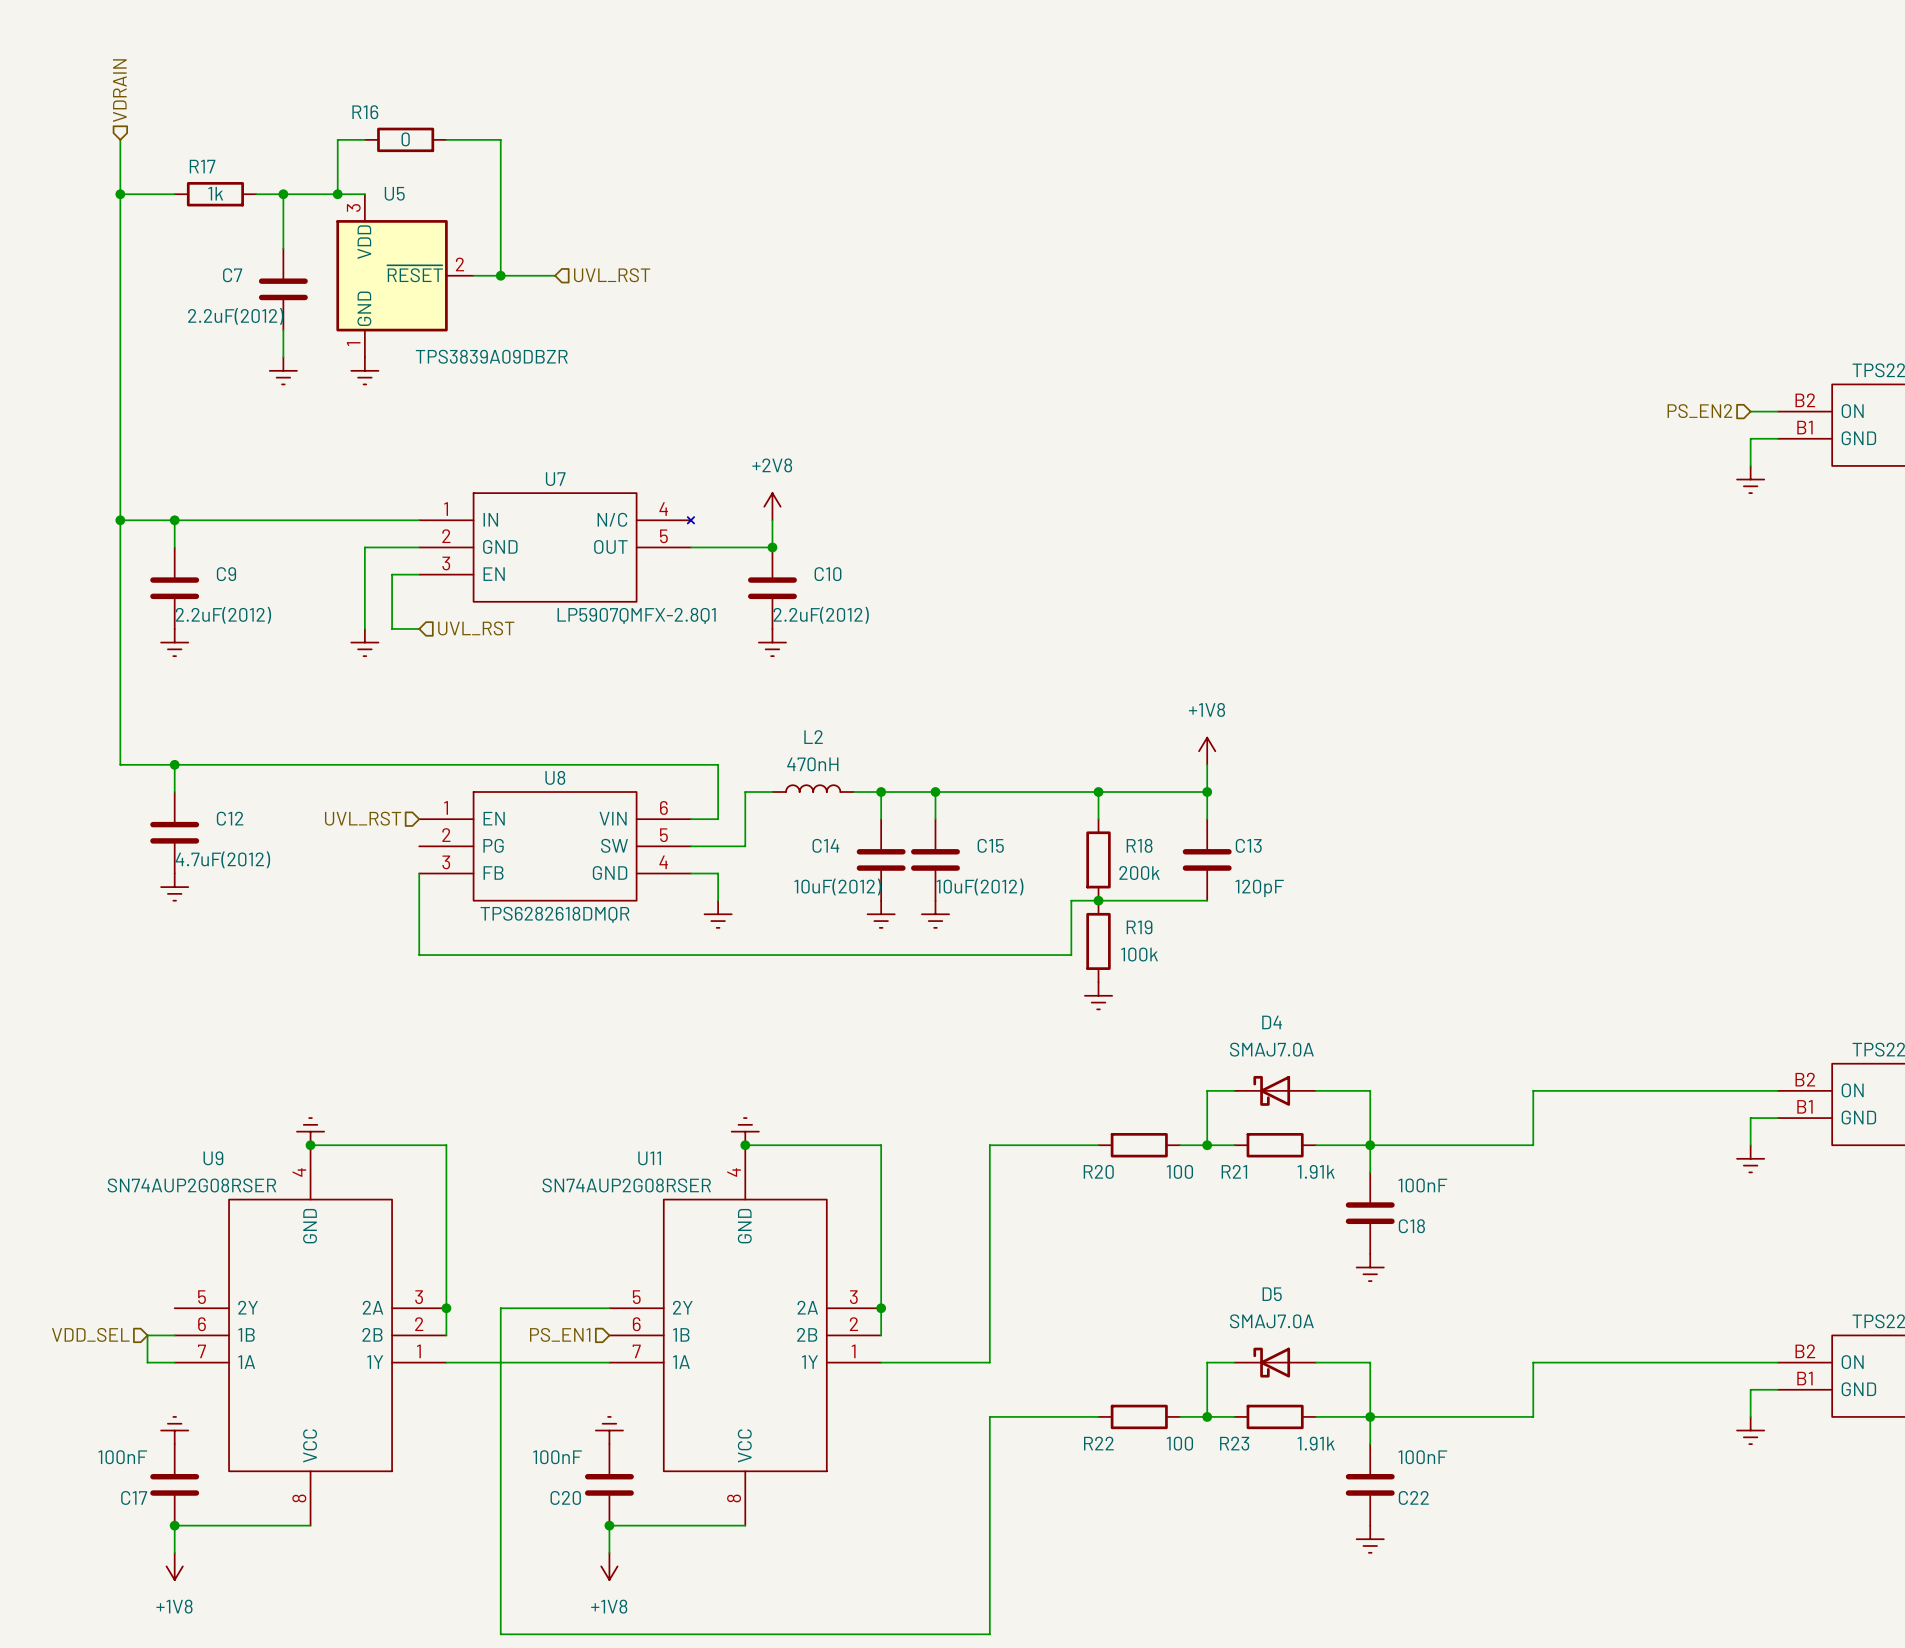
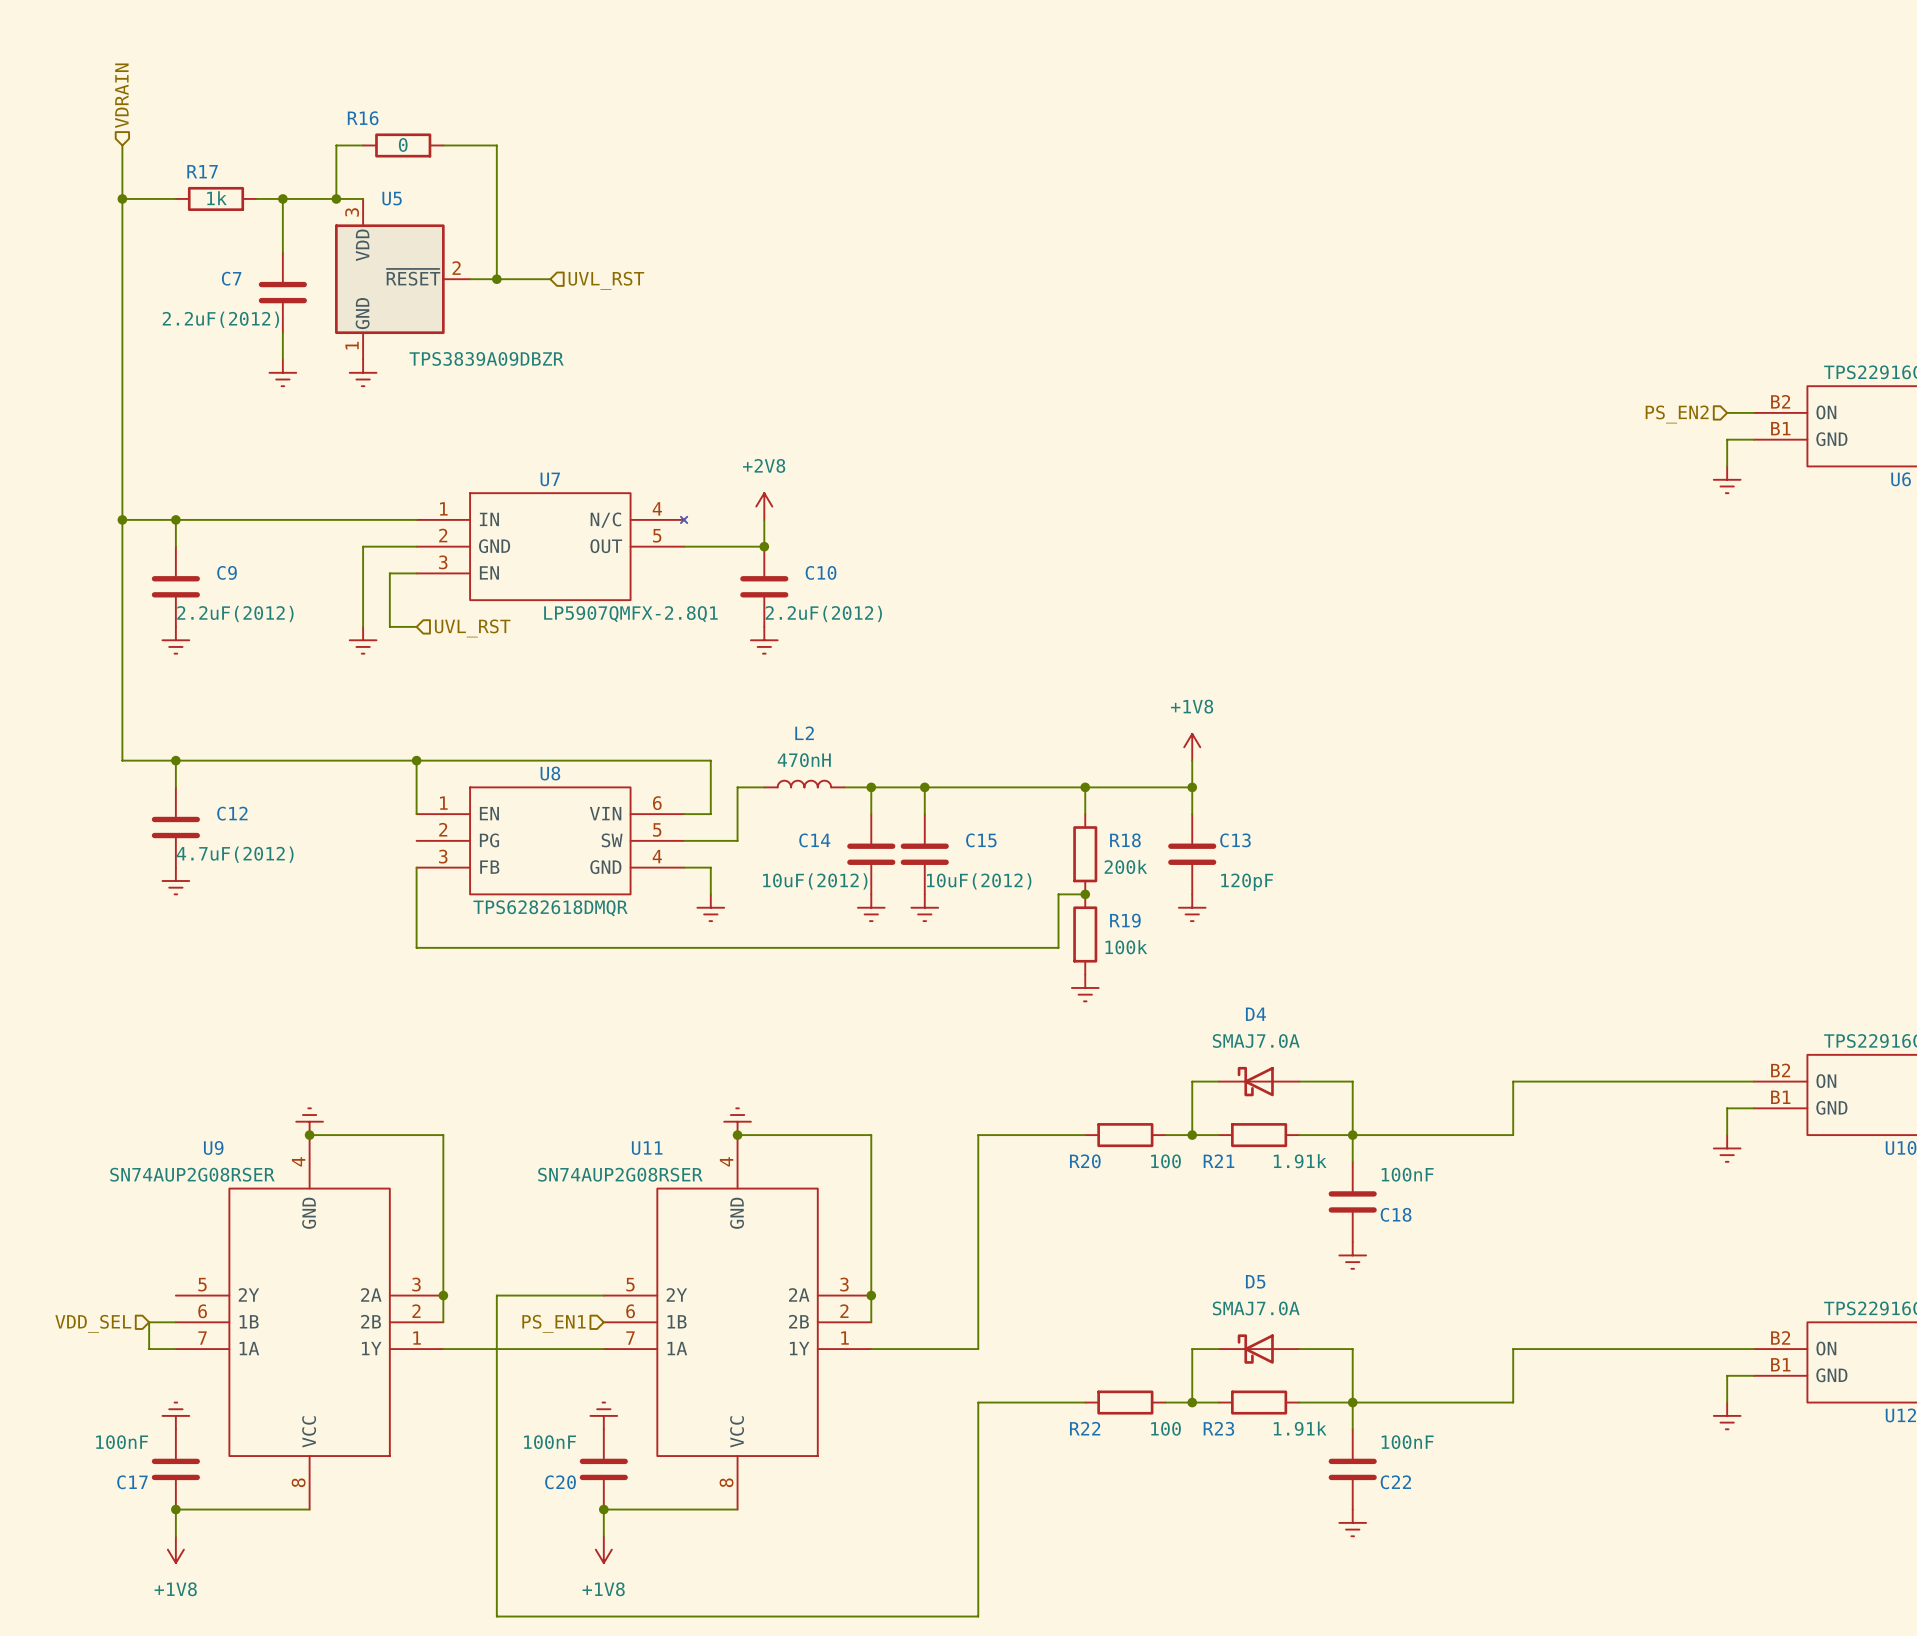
wire: none -> (416, 760) (416, 814)
junction: none -> (416, 760)
hierarchical label: UVL_RST (363, 818) -> none
wire: (1098, 900) (1207, 900) -> none
power symbol: none -> (1192, 907)

